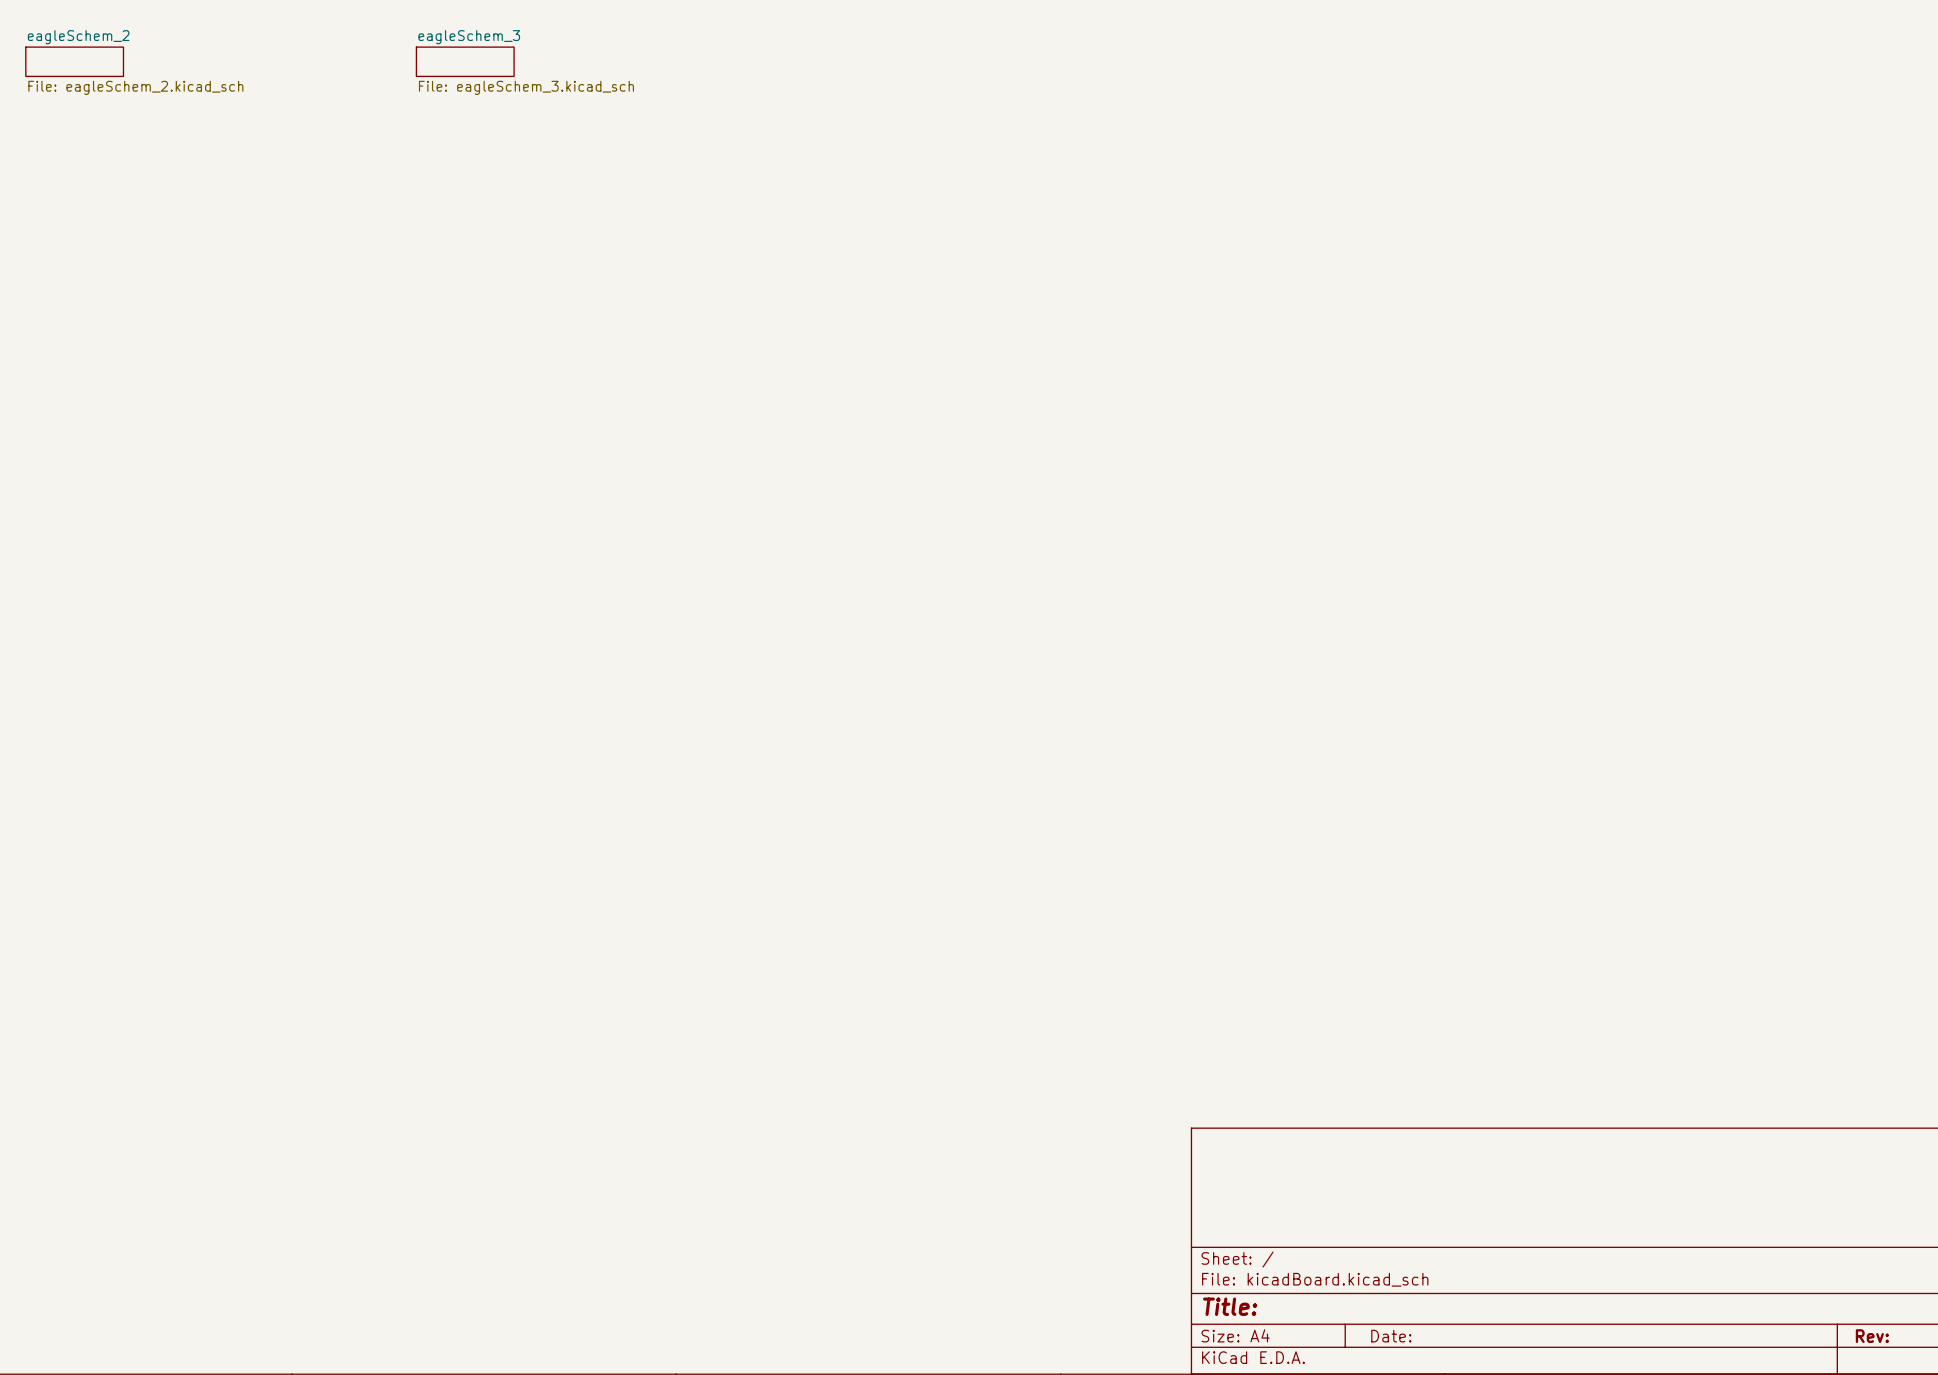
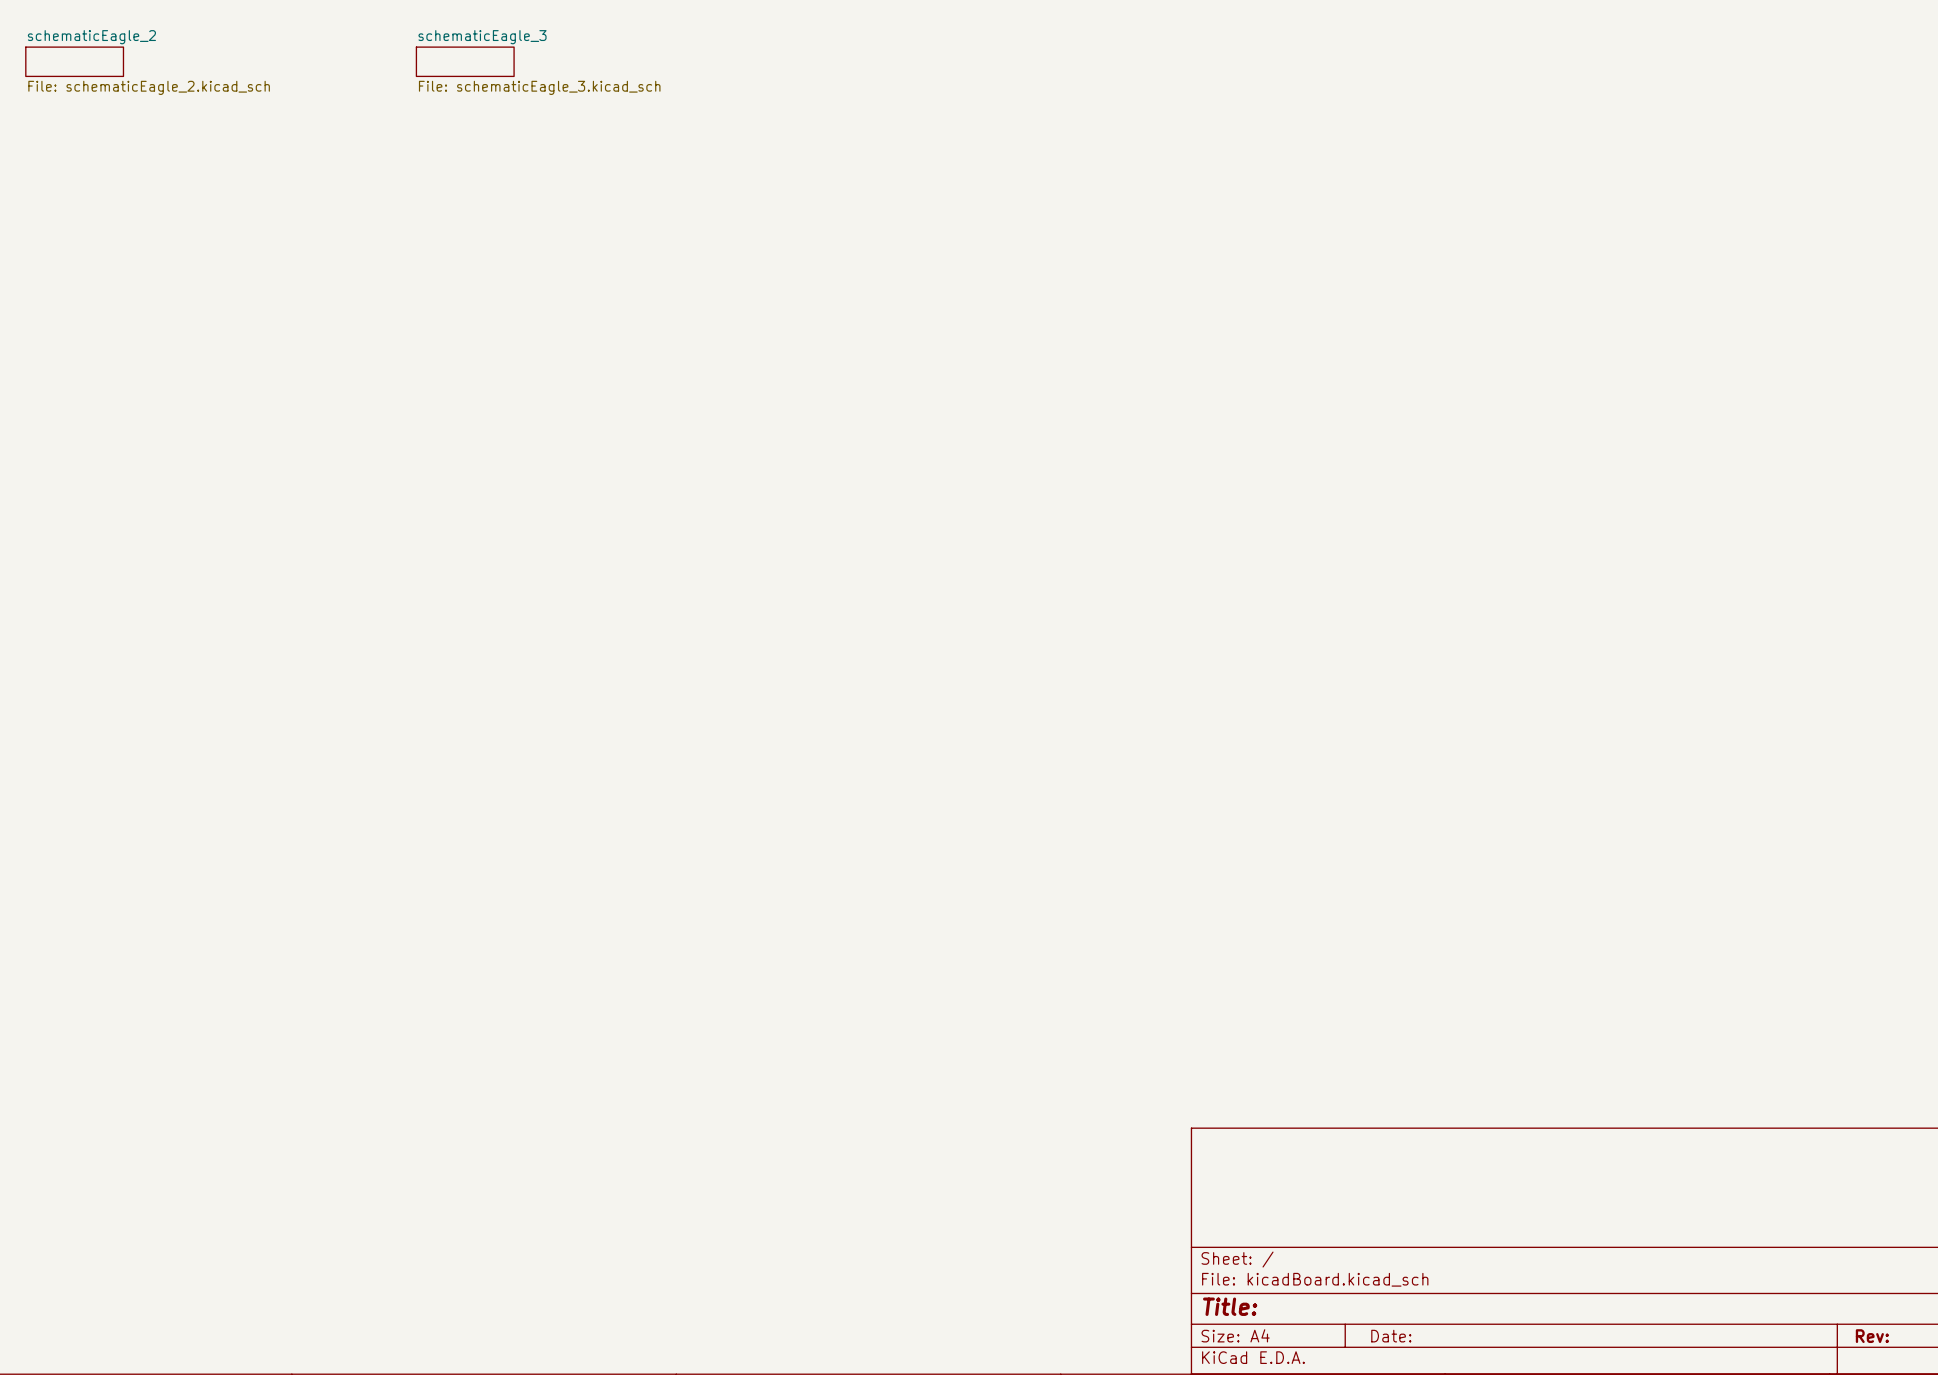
sheet eagleSchem_2 name: eagleSchem_2 (78, 37) -> schematicEagle_2 (91, 37)
sheet eagleSchem_3 name: eagleSchem_3 (469, 37) -> schematicEagle_3 (482, 37)
sheet eagleSchem_2 value: File: eagleSchem_2.kicad_sch (135, 87) -> File: schematicEagle_2.kicad_sch (149, 87)
sheet eagleSchem_3 value: File: eagleSchem_3.kicad_sch (526, 87) -> File: schematicEagle_3.kicad_sch (539, 87)

